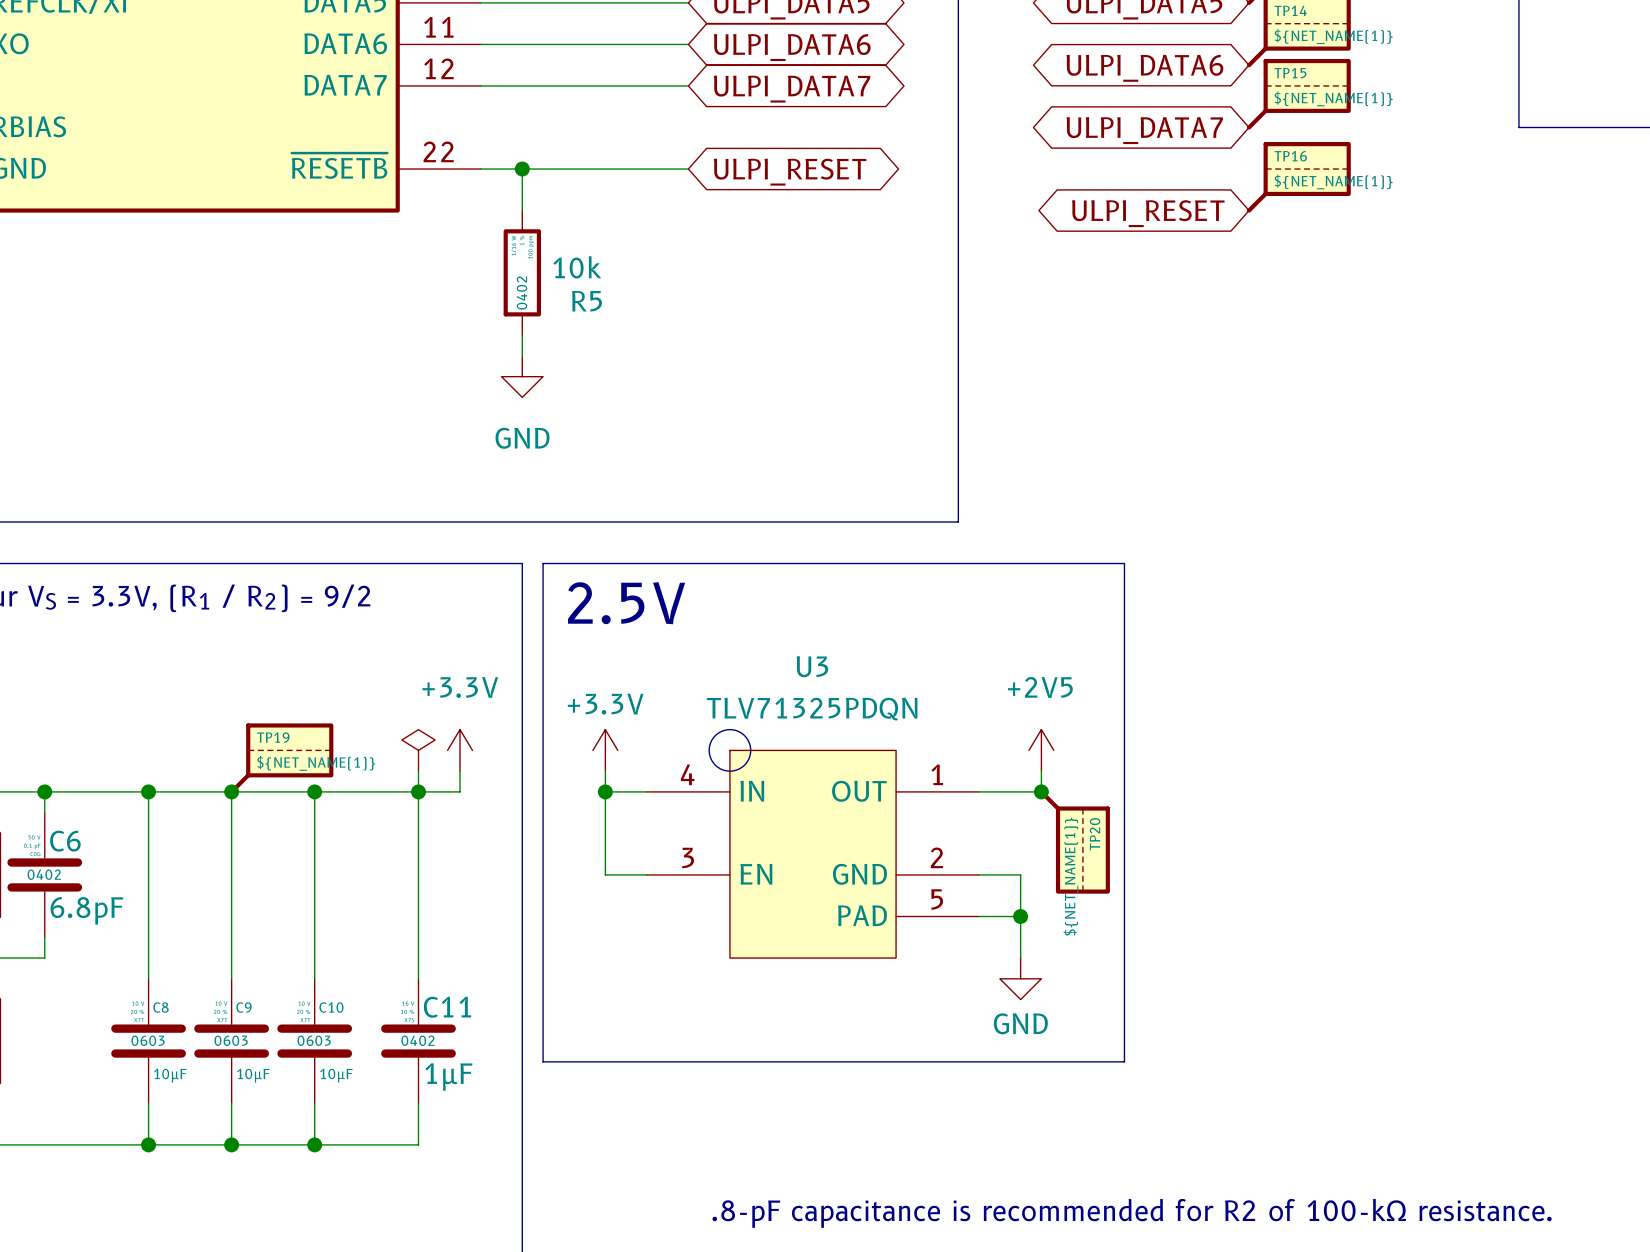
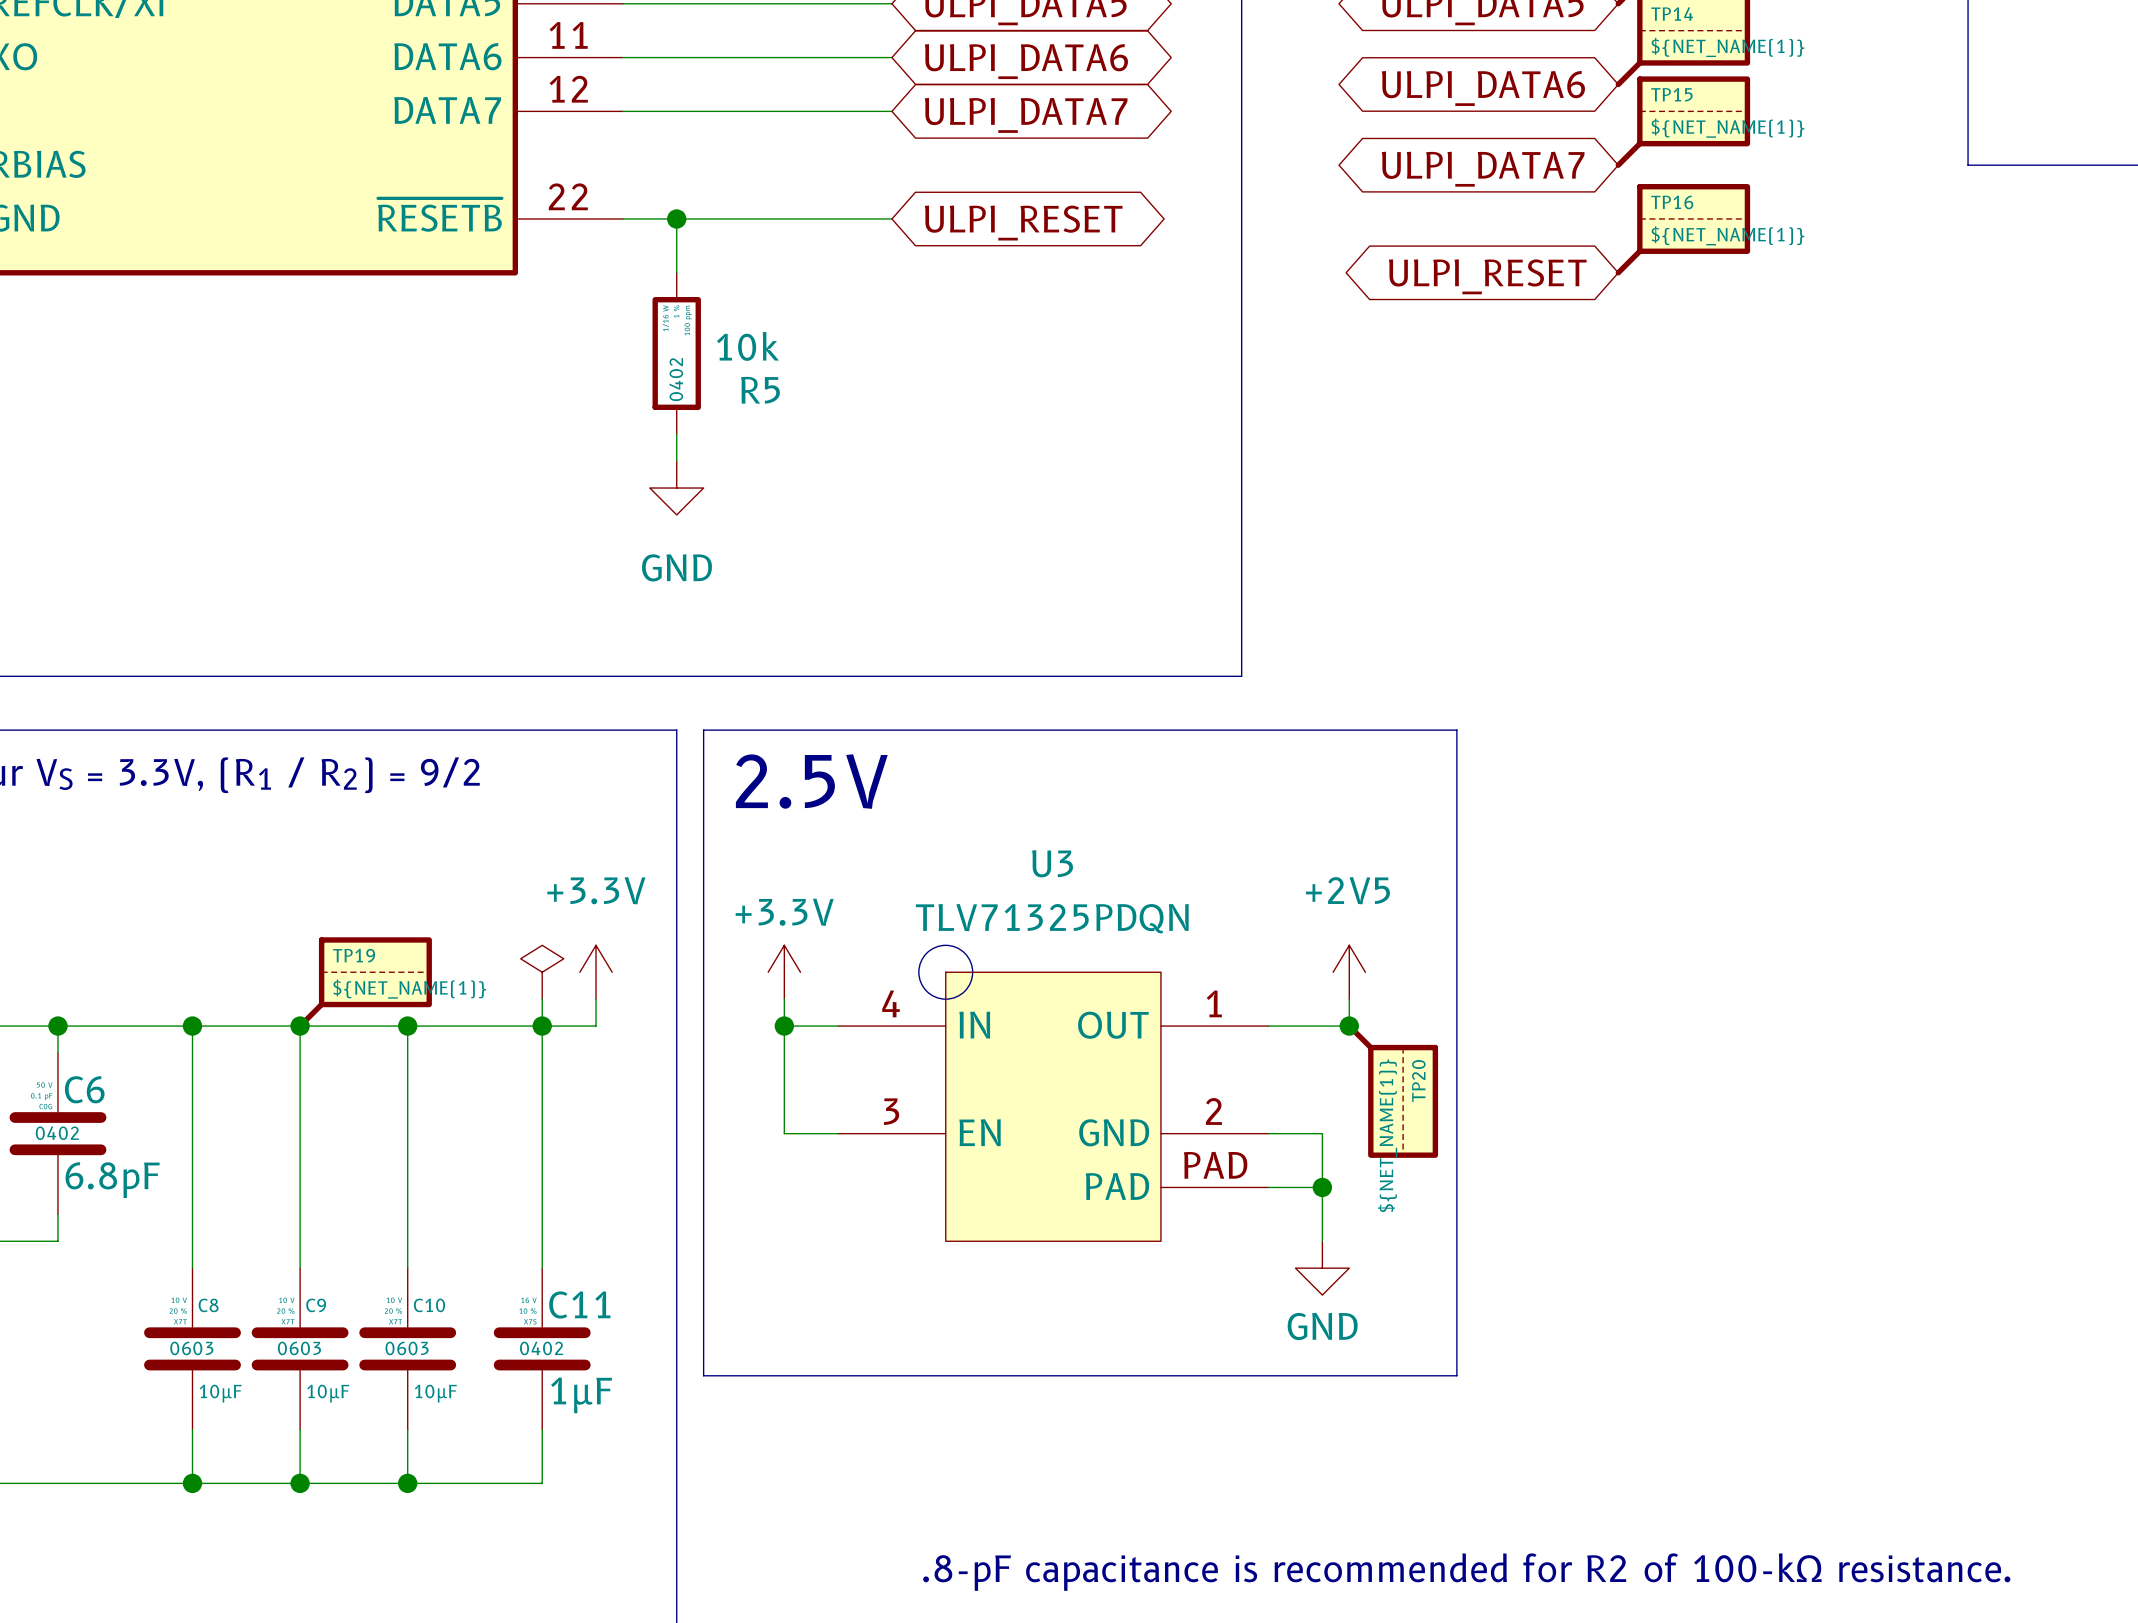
U3 pin number: 5 (937, 899) -> PAD (1215, 1165)

